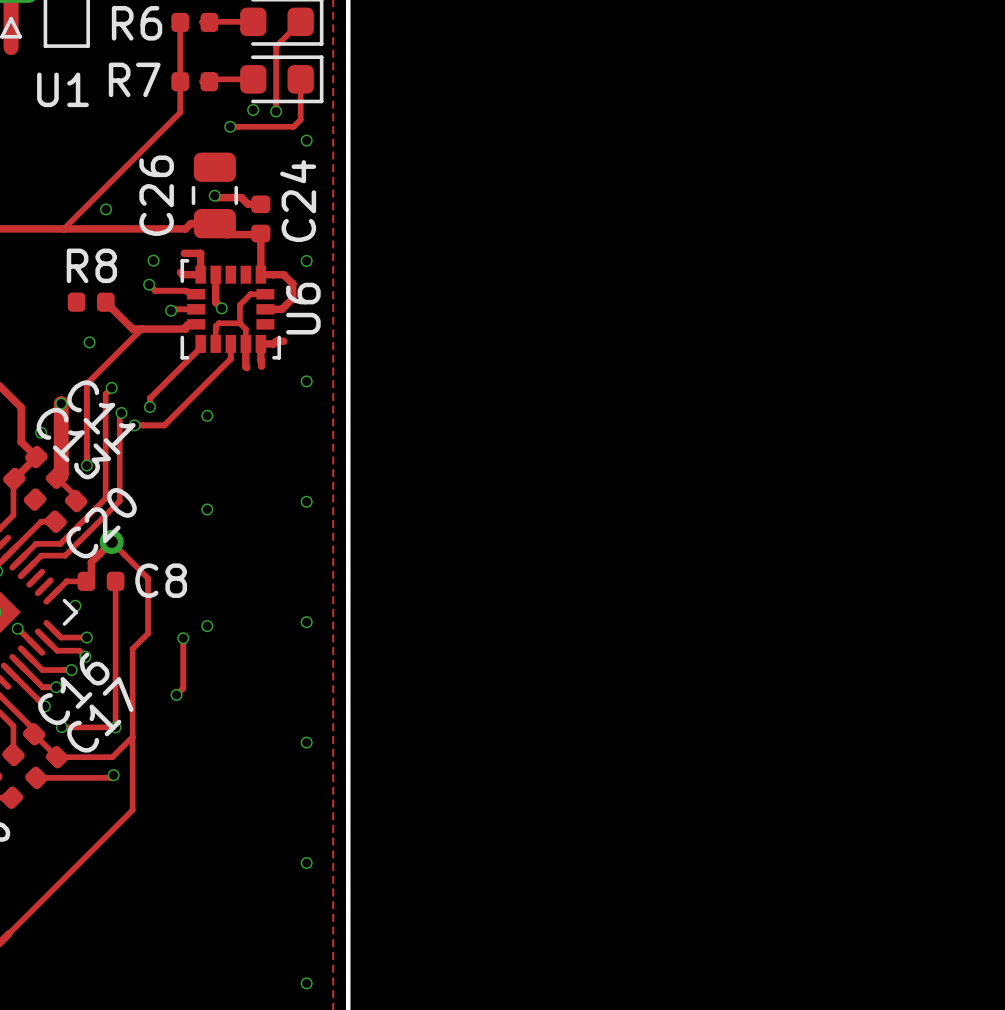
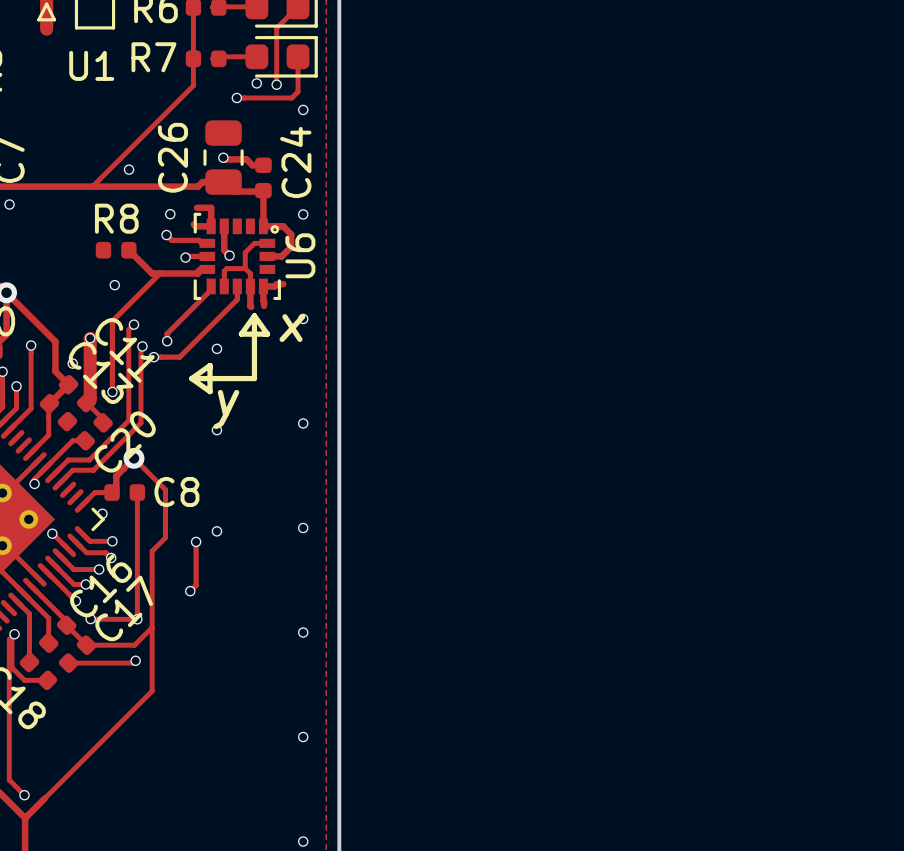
drawing: none -> [270, 225, 280, 234]
line: none -> (254, 315) (267, 334) (241, 334) (254, 315)
line: none -> (254, 315) (254, 378) (191, 378)
text: none -> x (292, 328)
line: none -> (191, 378) (210, 365) (210, 391) (191, 378)
text: none -> y (226, 409)

